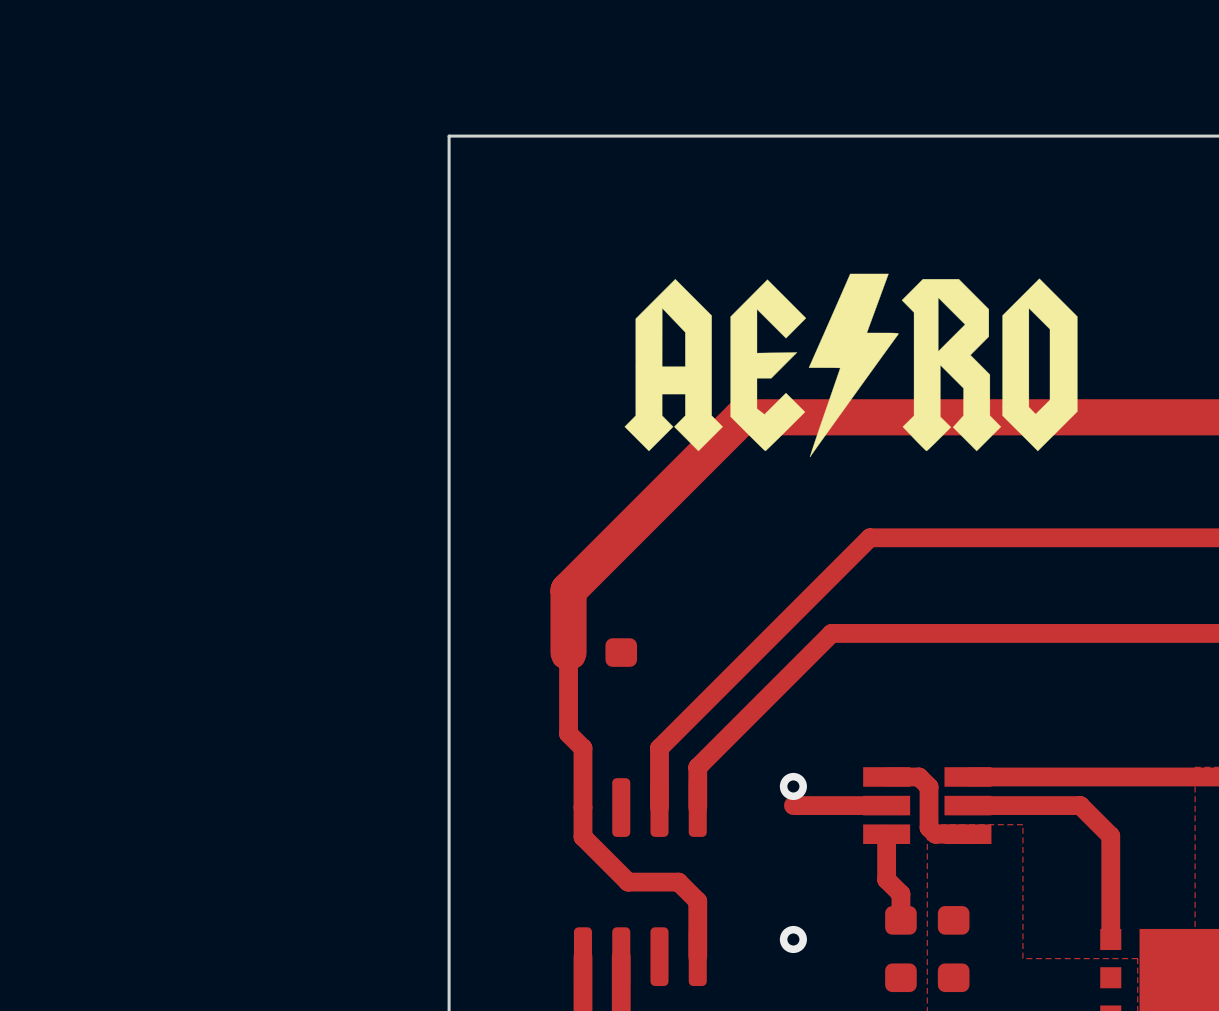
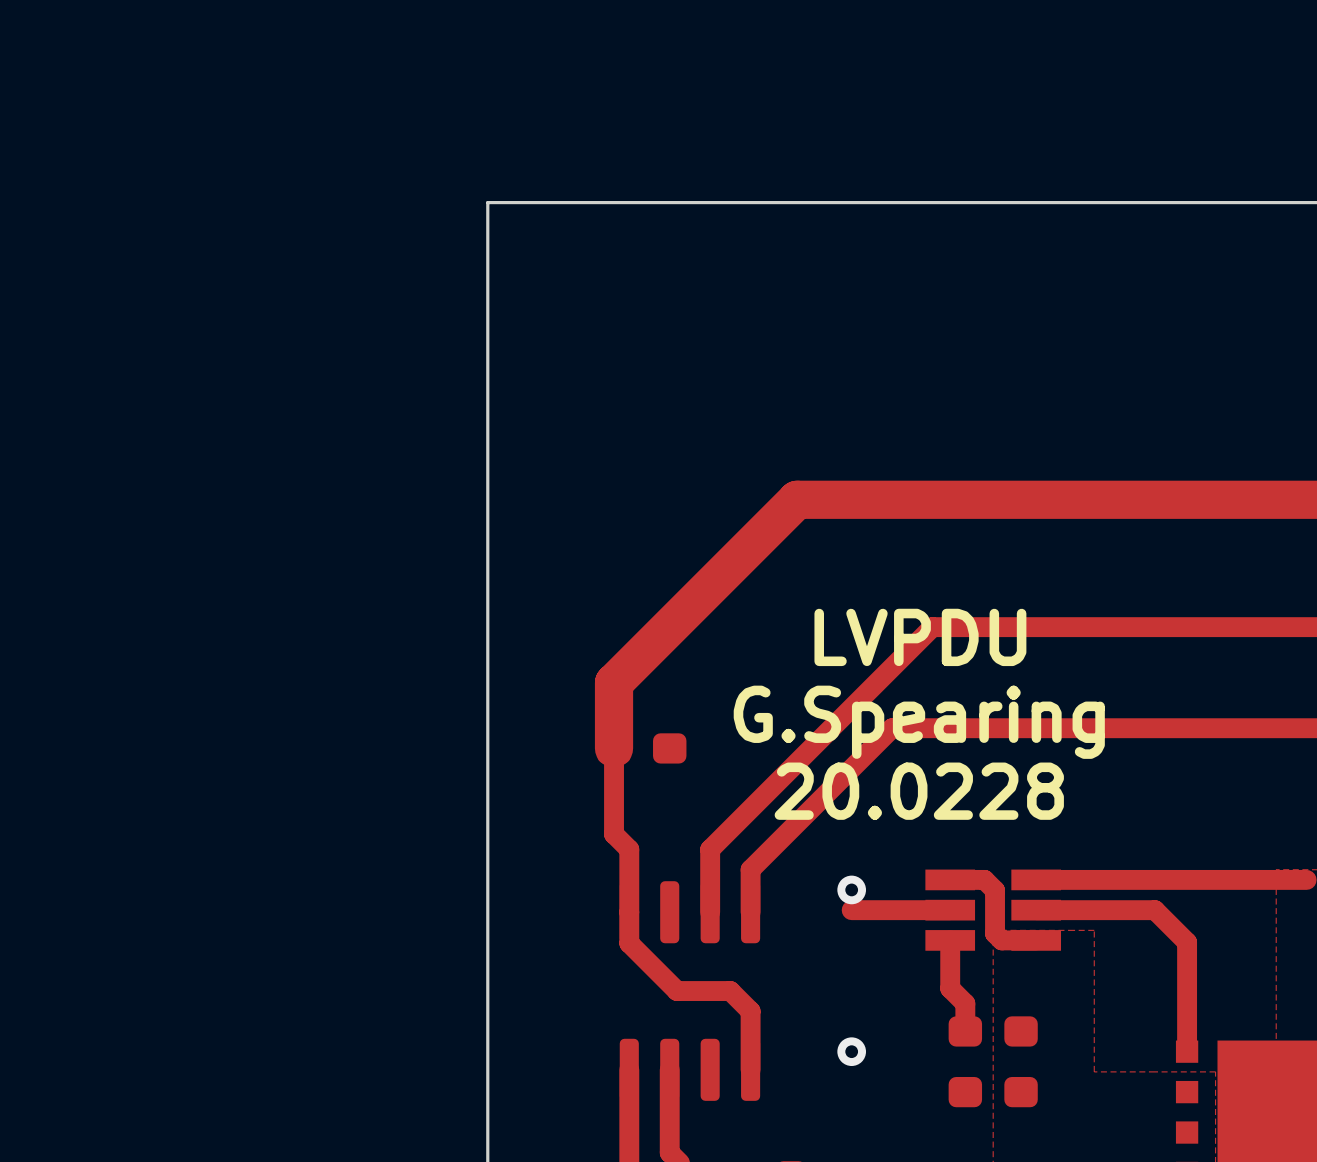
drawing: [624, 273, 1078, 458] -> none
text: none -> LVPDU (920, 637)
text: none -> G.Spearing (919, 722)
text: none -> 20.0228 (919, 791)

